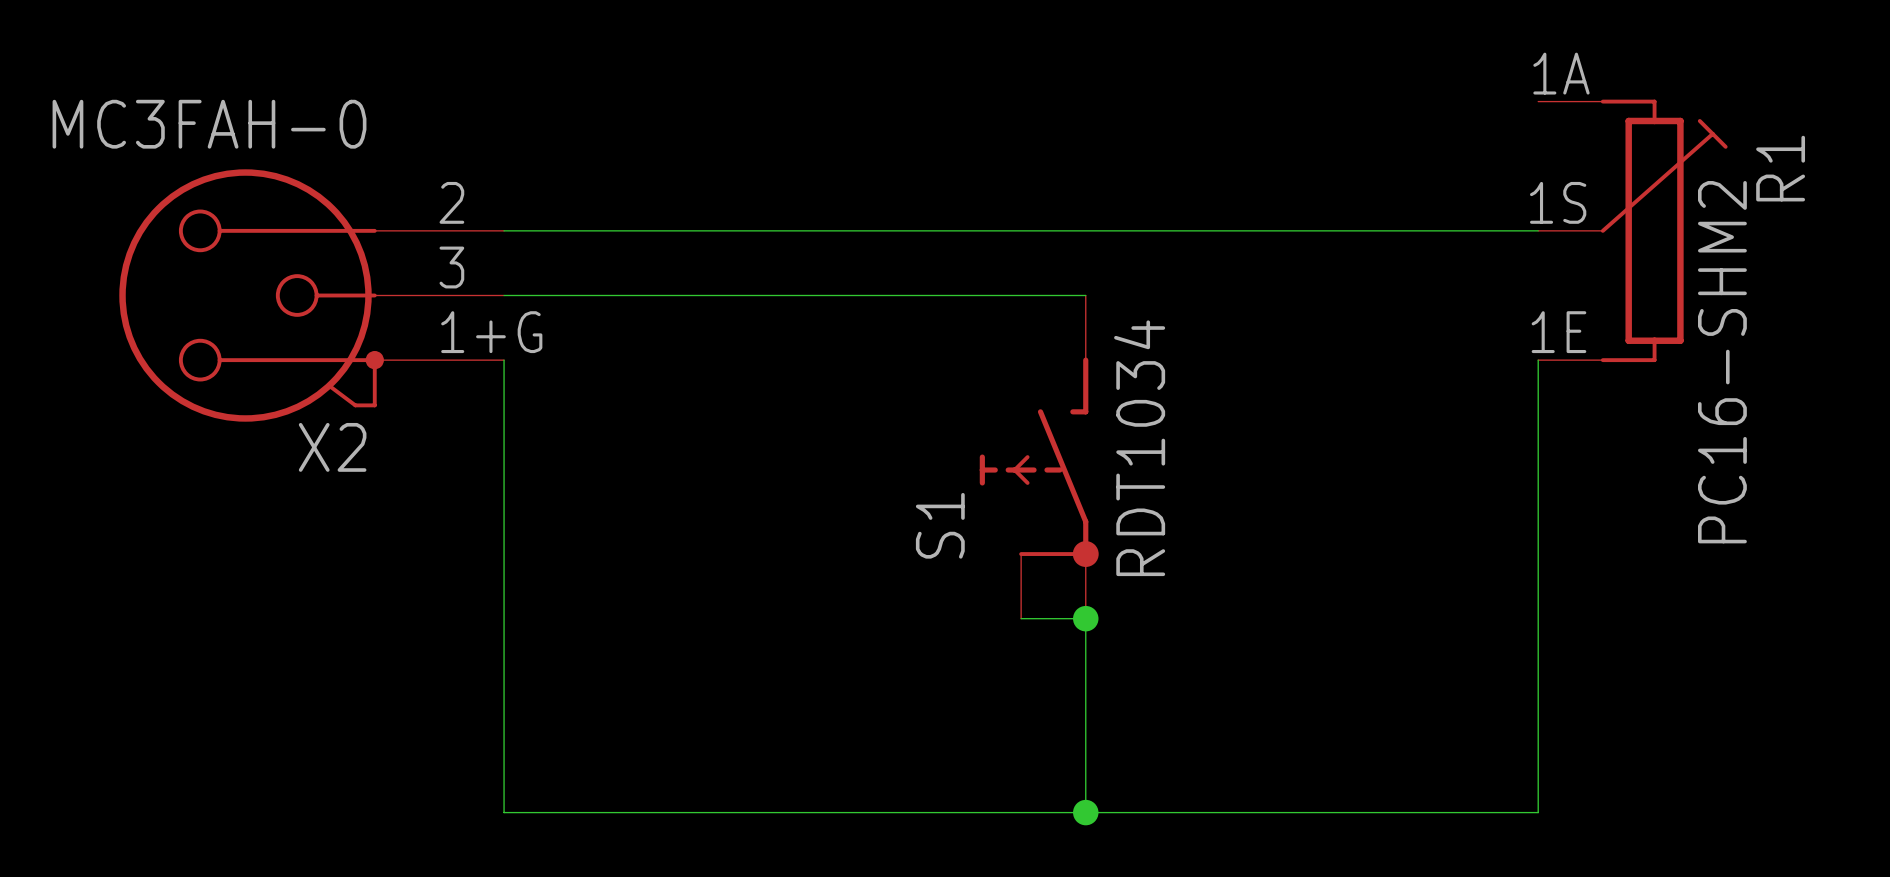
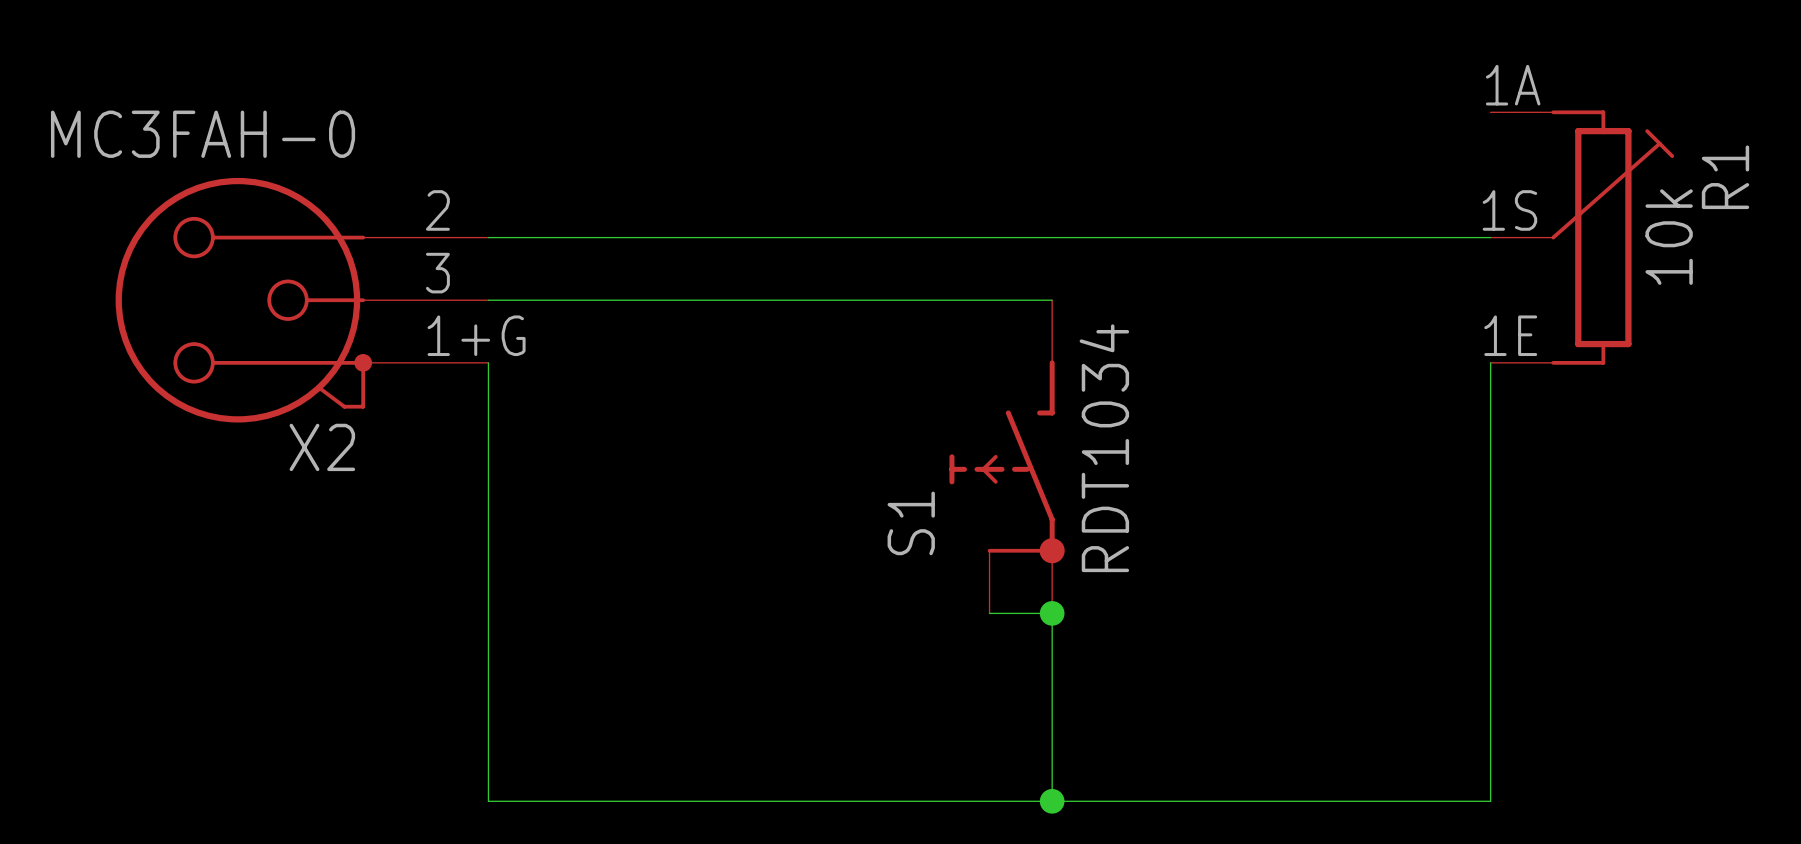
R1 value: PC16-SHM2 (1722, 362) -> 10k (1669, 237)

